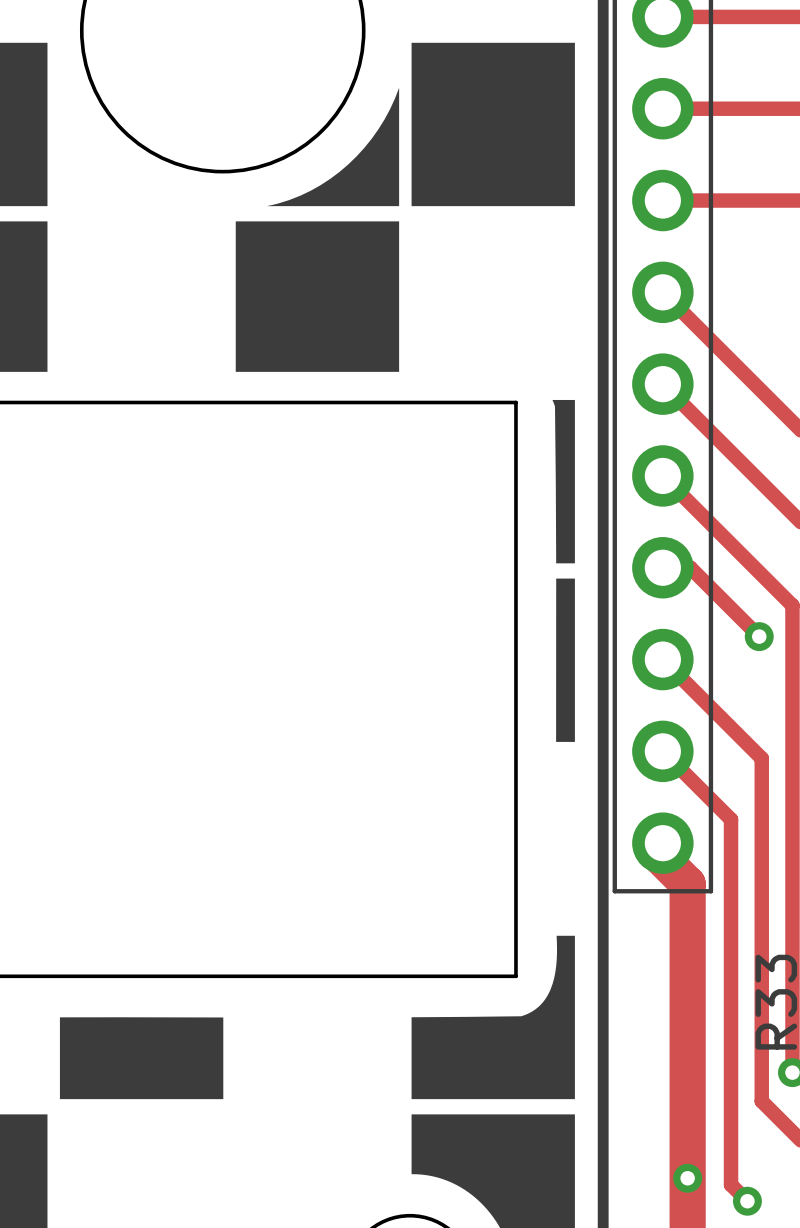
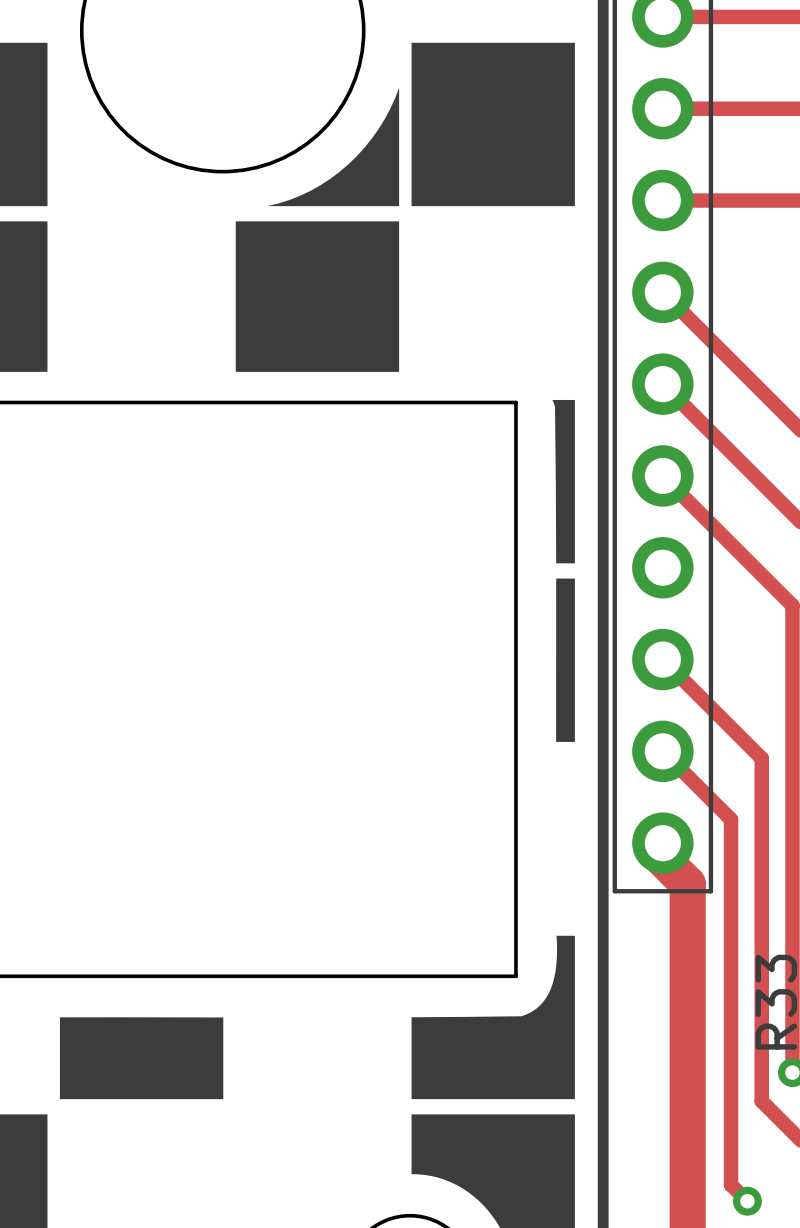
track: (662, 567) (690, 567) (759, 636) -> none
via: (759, 636) -> none
via: (687, 1178) -> none

